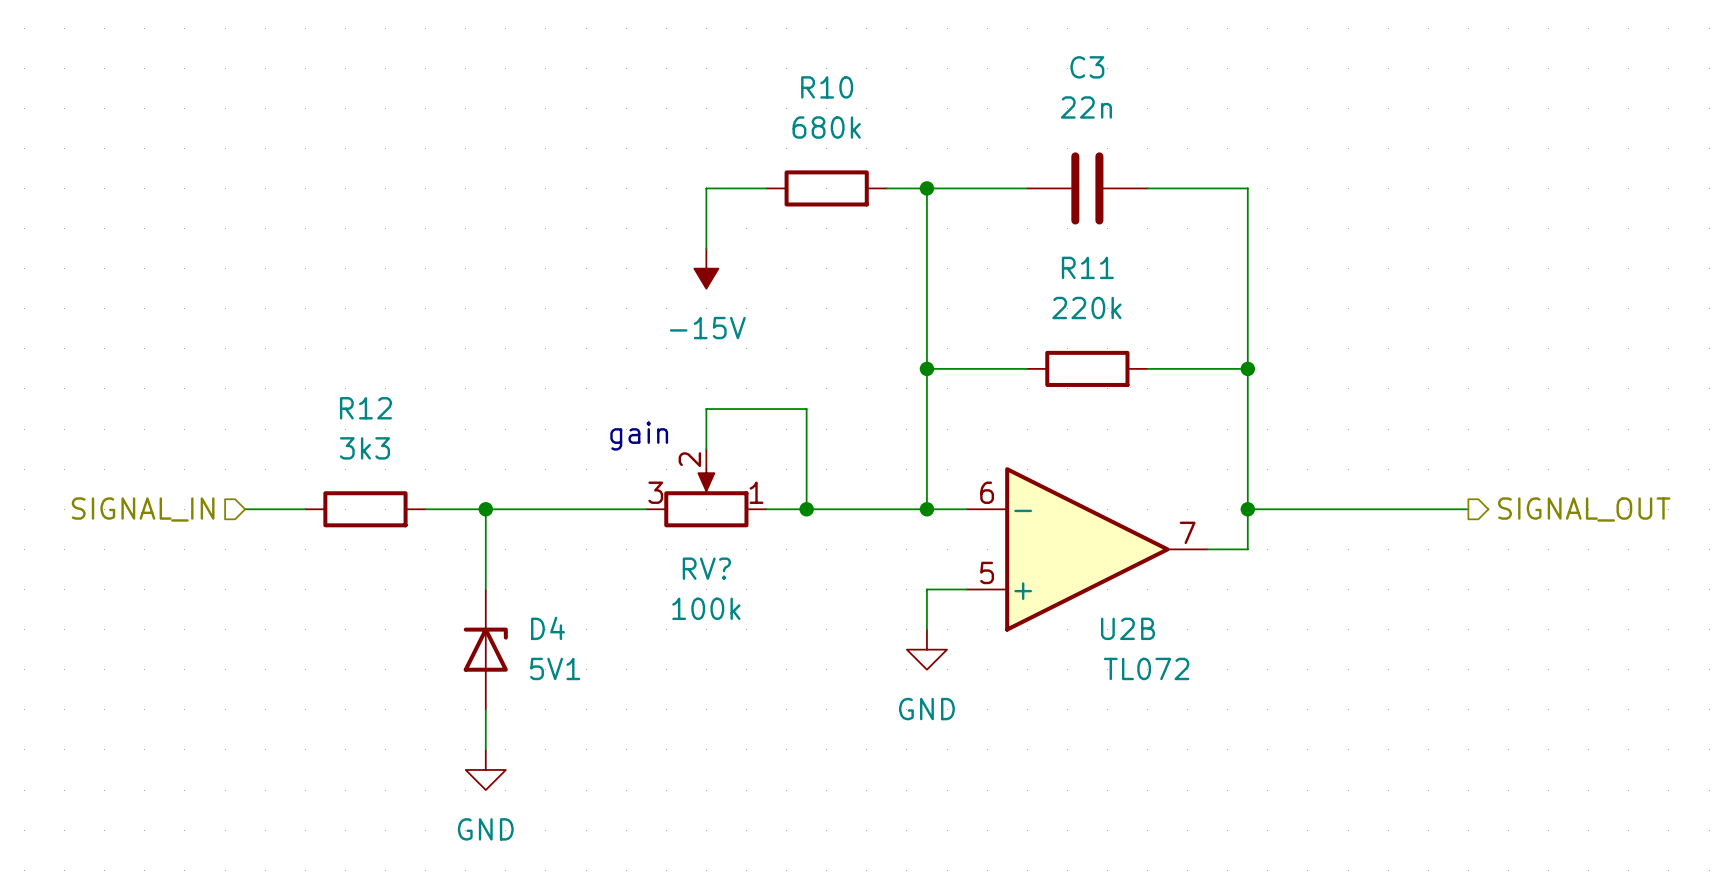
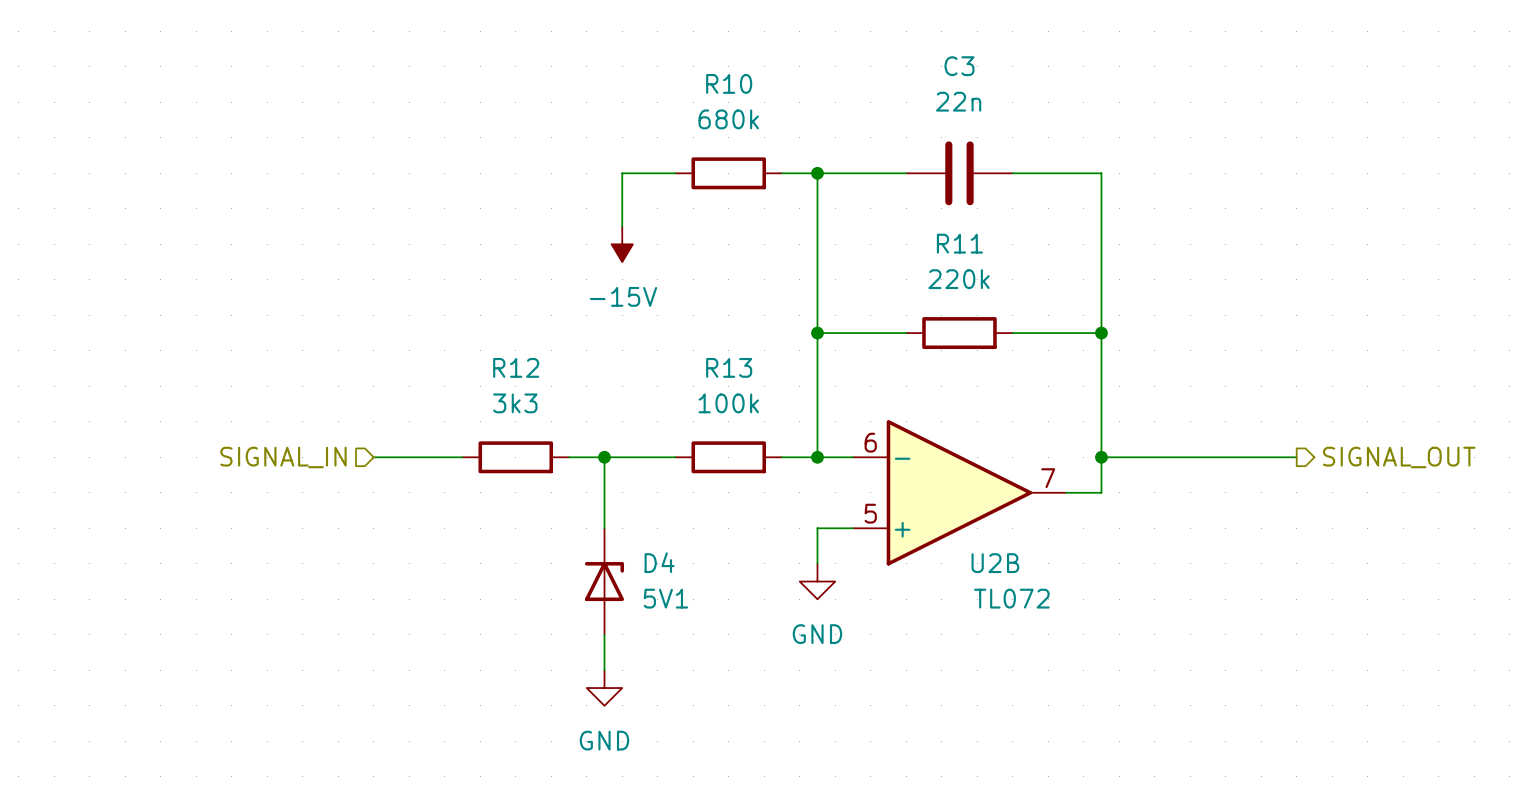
text: gain (639, 436) -> none
wire: (706, 449) (706, 409) (806, 409) (806, 509) -> none
RV?: 100k (706, 488) -> none
hierarchical label position: SIGNAL_IN (143, 509) -> SIGNAL_IN (283, 457)
wire: (245, 509) (305, 509) -> none
R12 position: (365, 509) -> (515, 457)
wire: (485, 509) (485, 589) -> (604, 457) (604, 528)
junction: (485, 509) -> none
wire: (525, 509) (646, 509) -> (675, 457) (569, 457)
junction: none -> (604, 457)
wire: (766, 509) (886, 509) -> none
junction: (806, 509) -> none
R13: none -> 100k (728, 457)
D4 position: (485, 649) -> (604, 581)
wire: (485, 709) (485, 749) -> (604, 634) (604, 670)
power symbol position: GND (485, 769) -> GND (604, 688)

